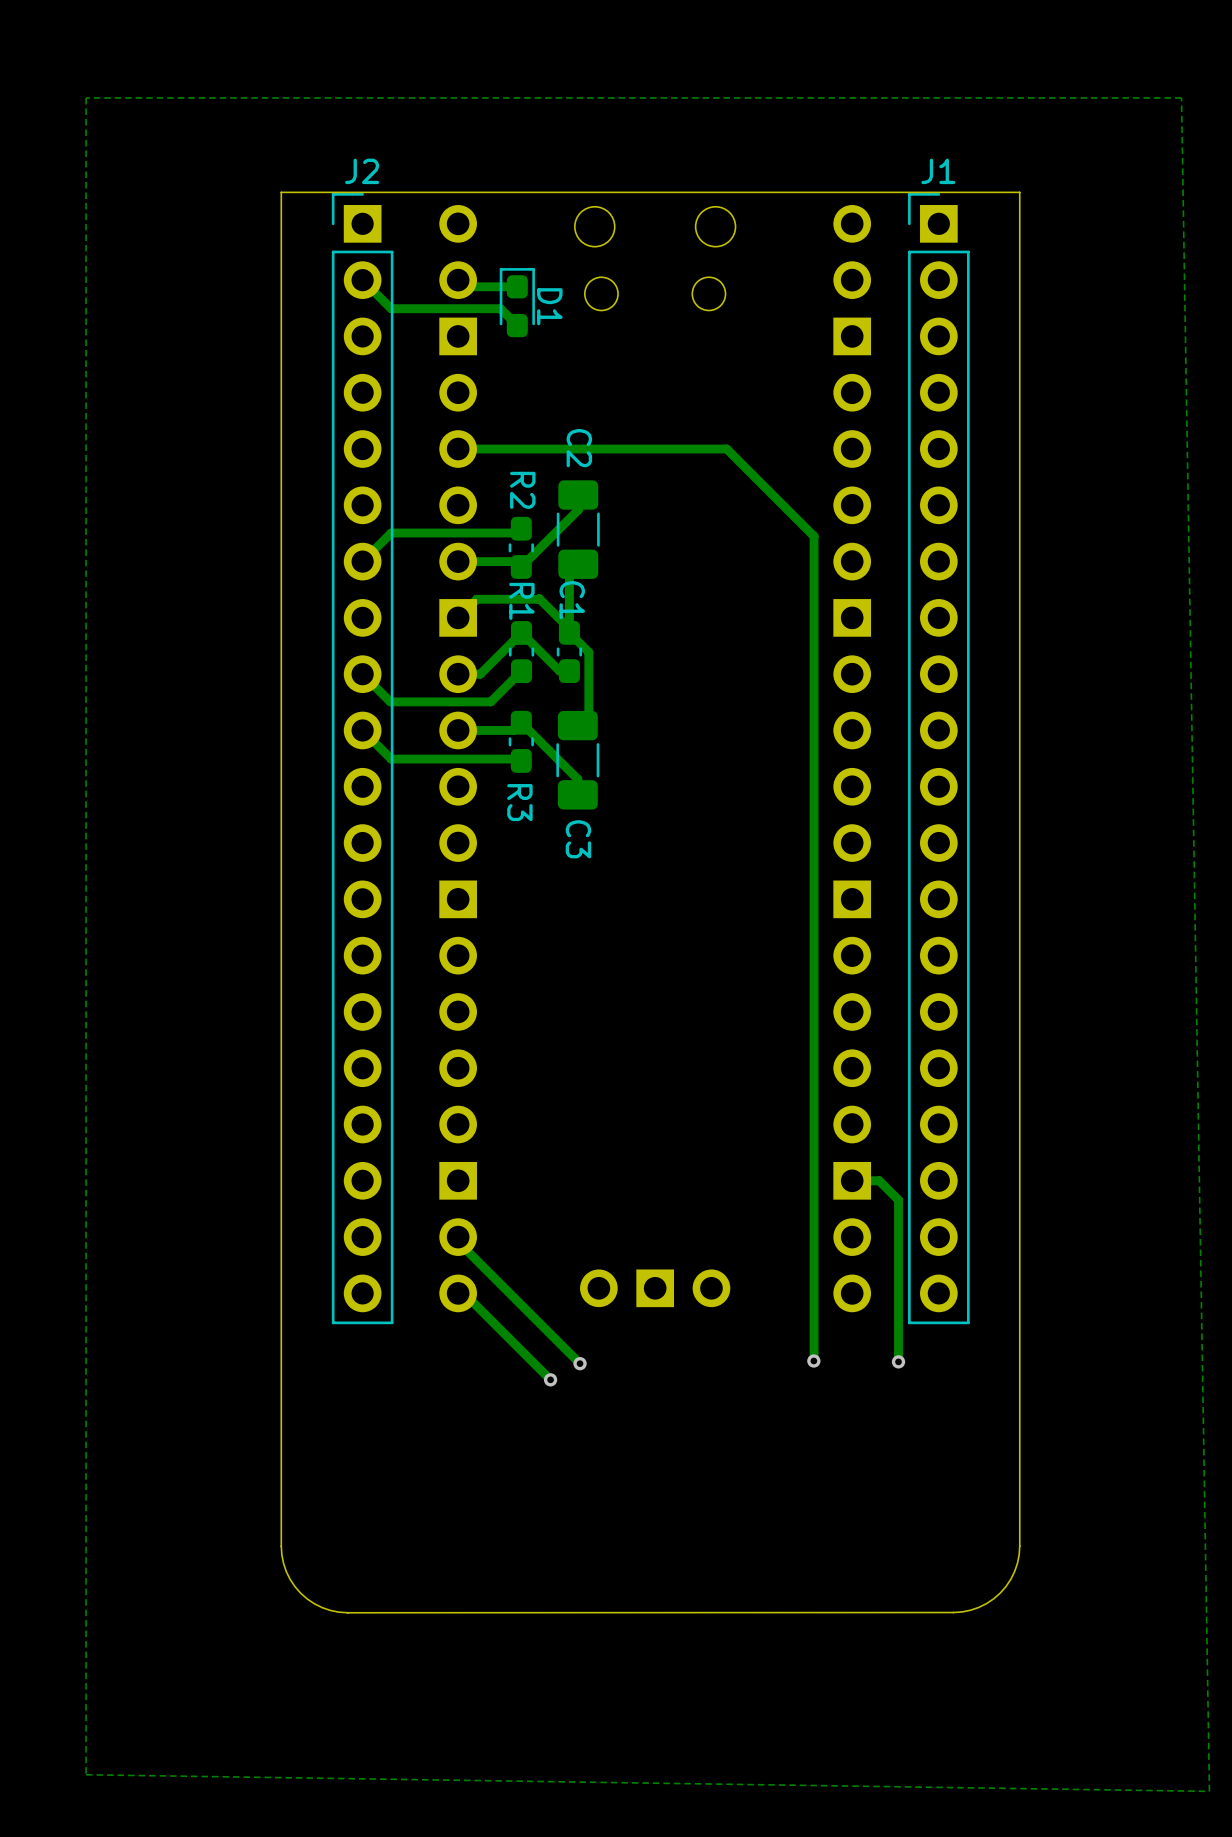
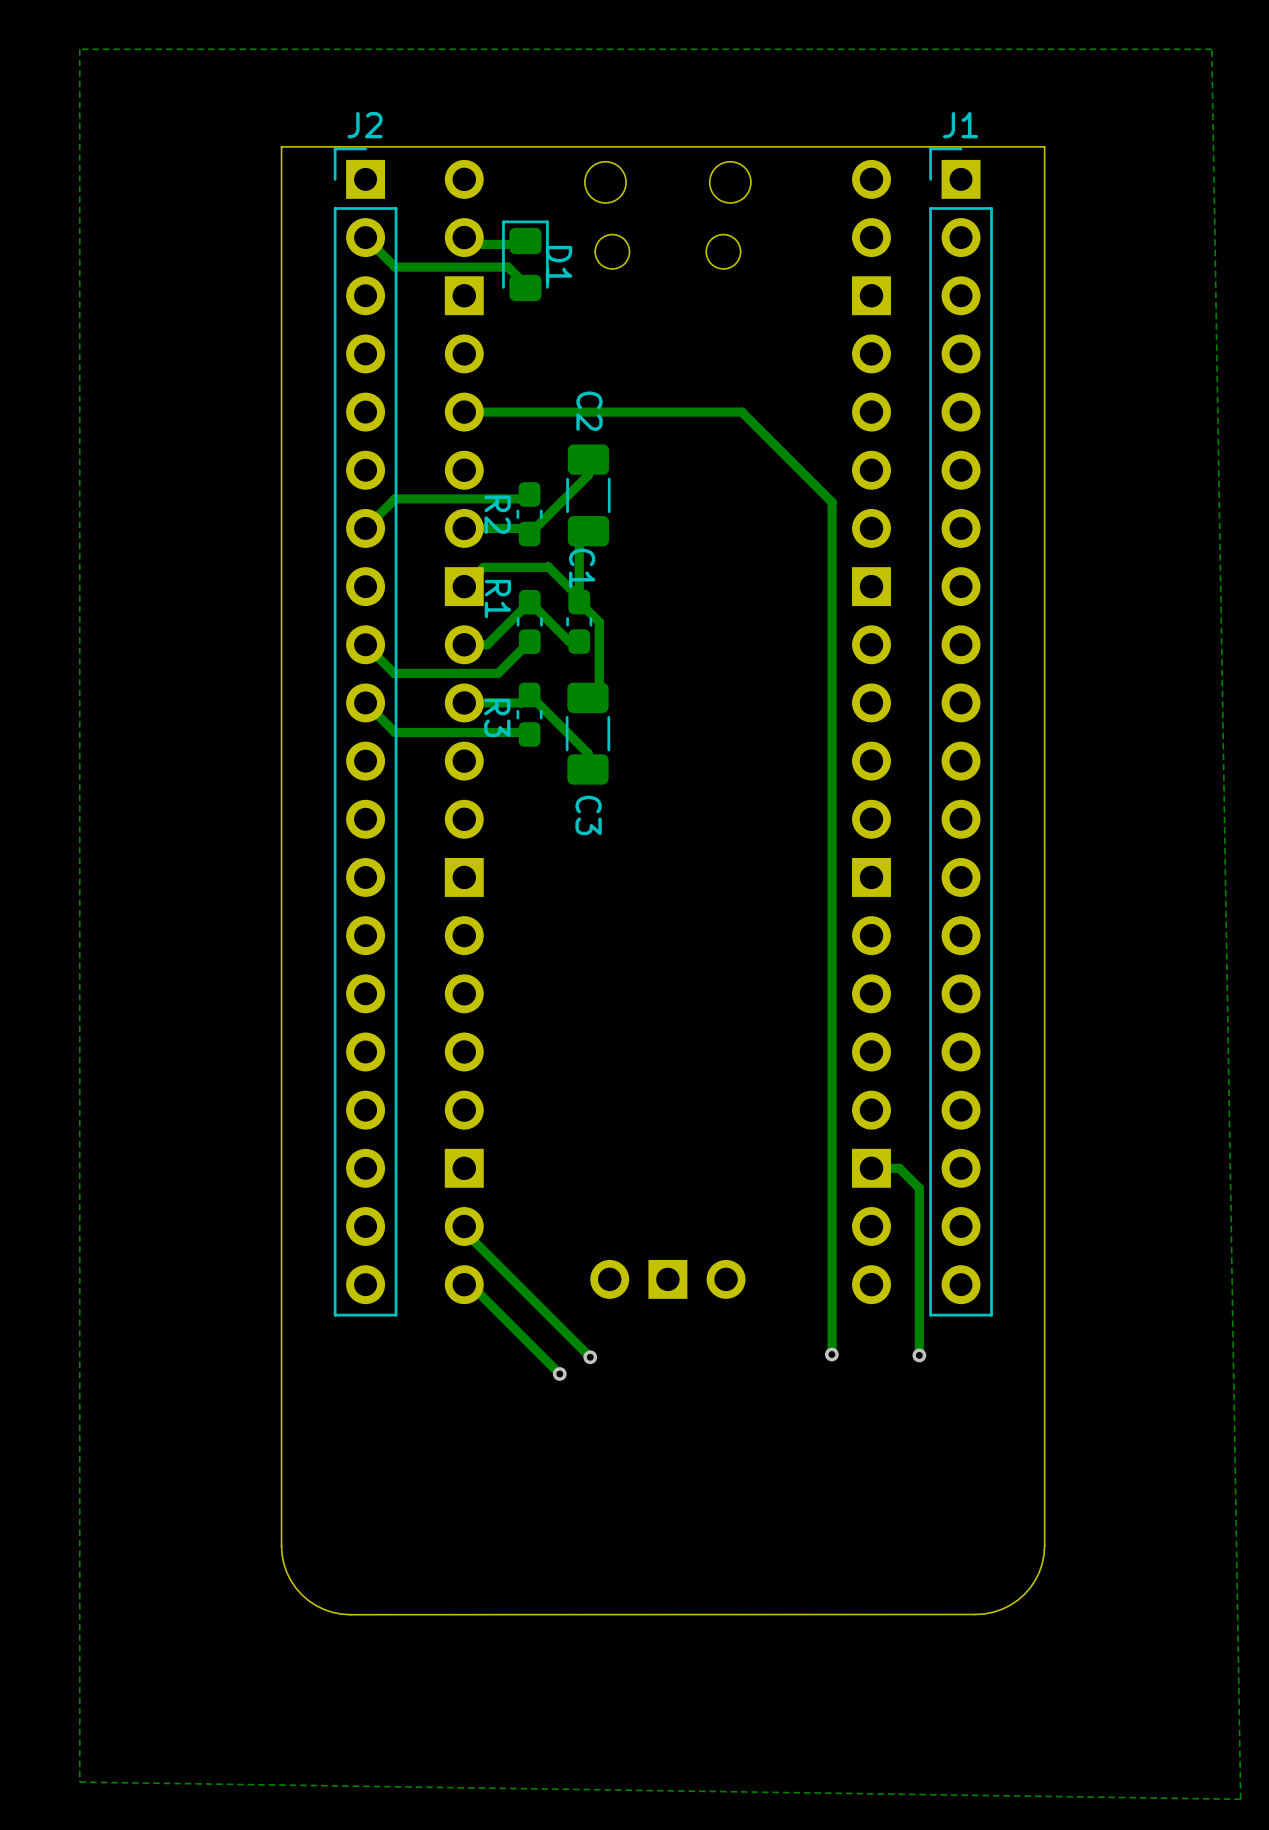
D1 footprint: [499, 268, 535, 338] -> [502, 220, 549, 302]
R2 name position: R2 (522, 490) -> R2 (497, 514)
R1 name position: R1 (521, 601) -> R1 (497, 599)
R3 name position: R3 (519, 802) -> R3 (497, 717)

